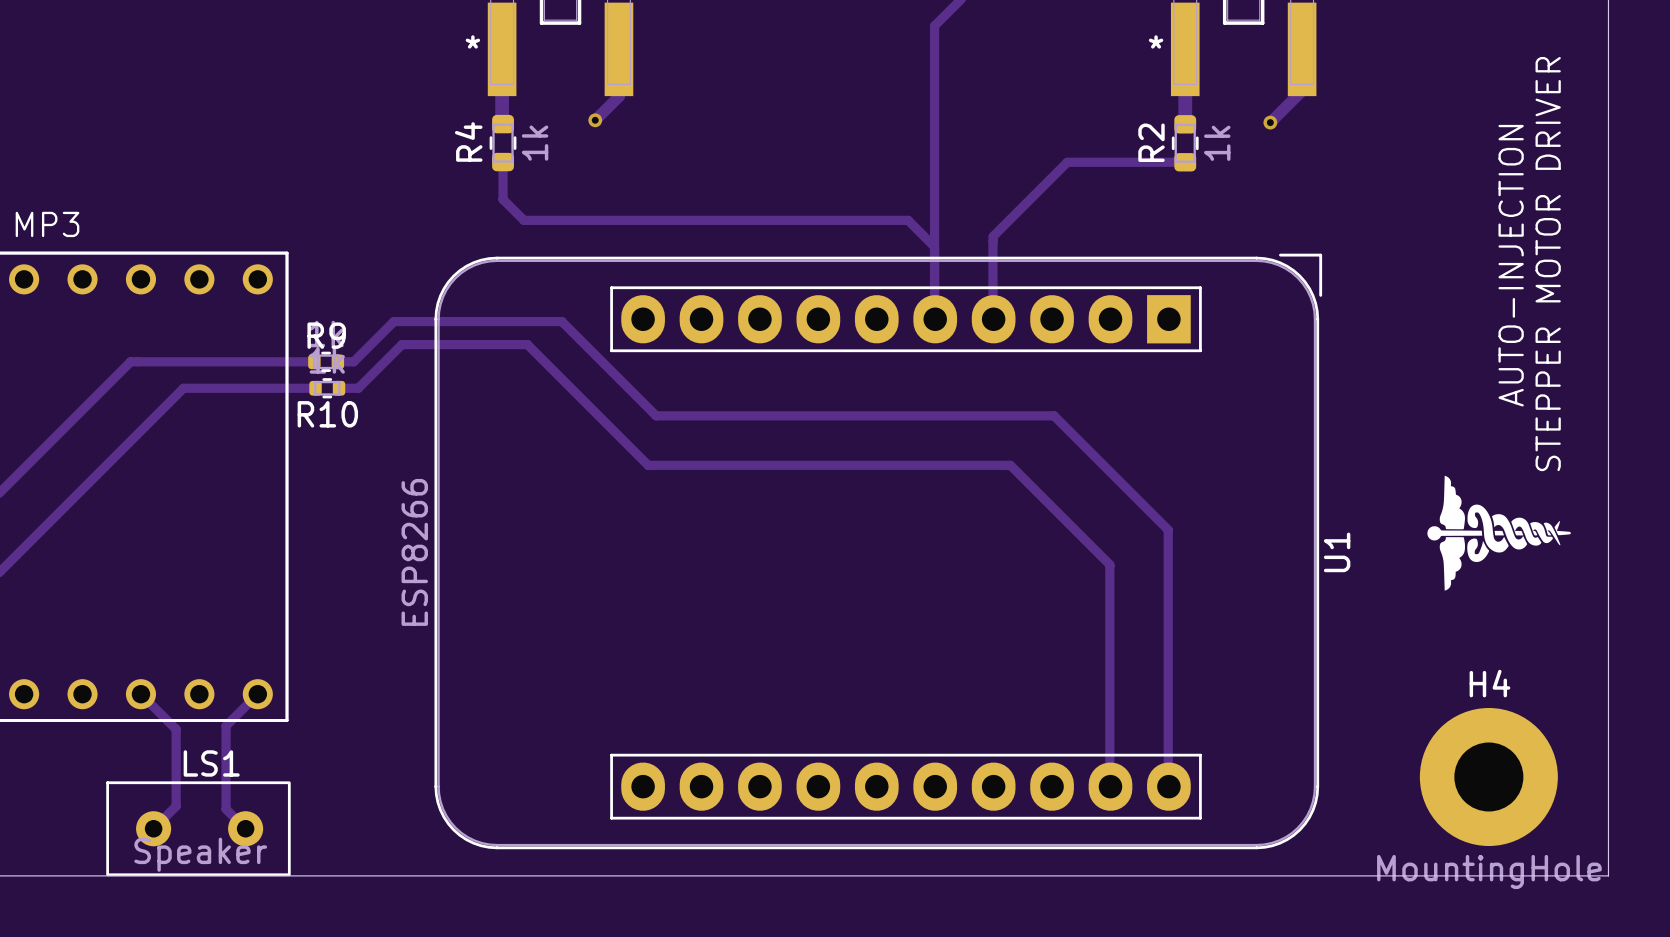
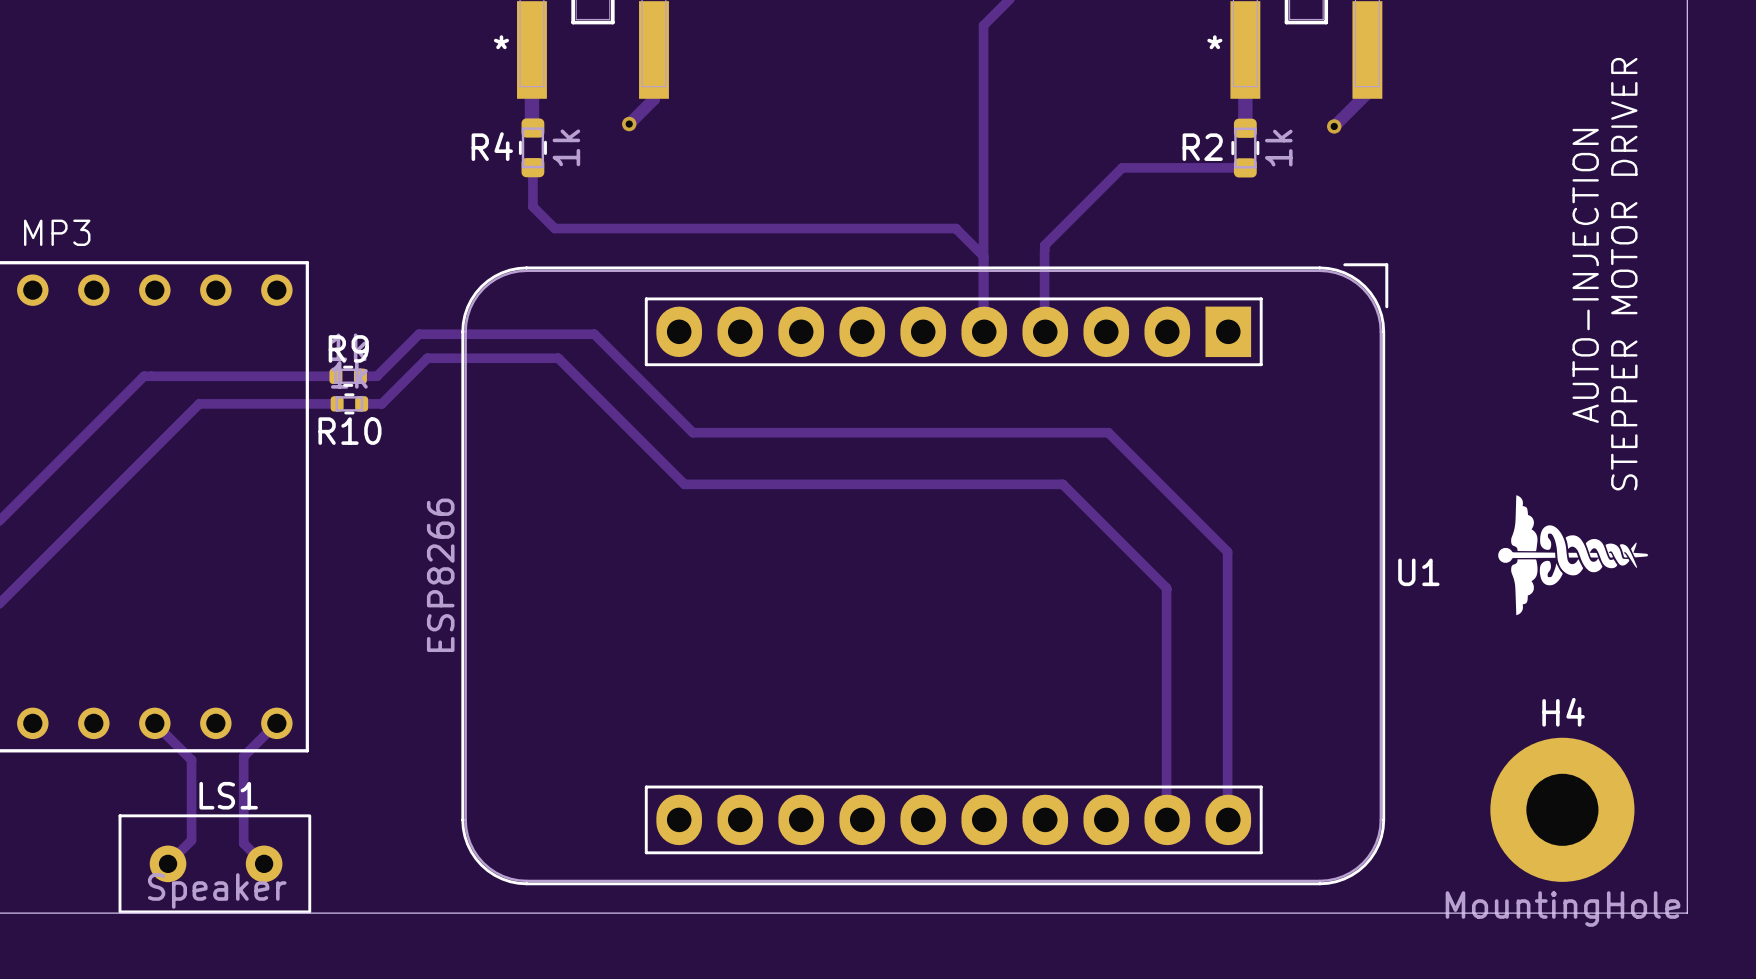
R4 name rotation: 0° (468, 141) -> 90° clockwise (492, 146)
R2 name rotation: 0° (1151, 142) -> 90° clockwise (1202, 147)
U1 name rotation: 0° (1337, 552) -> 90° clockwise (1418, 572)

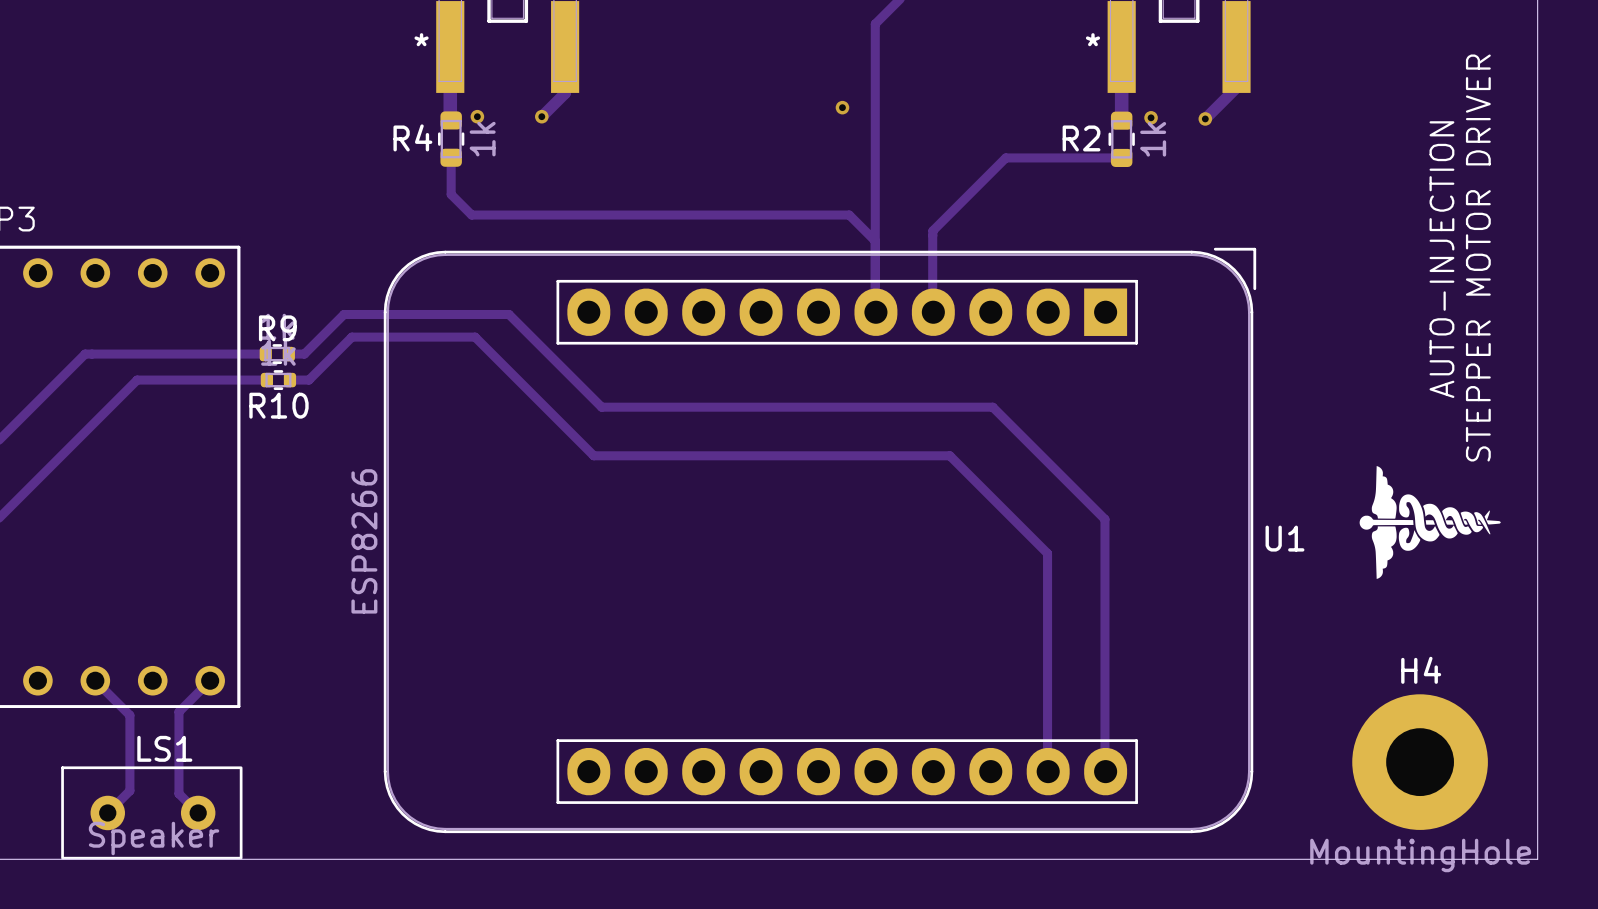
via: none -> (842, 107)
via: none -> (477, 116)
via: none -> (1151, 117)

